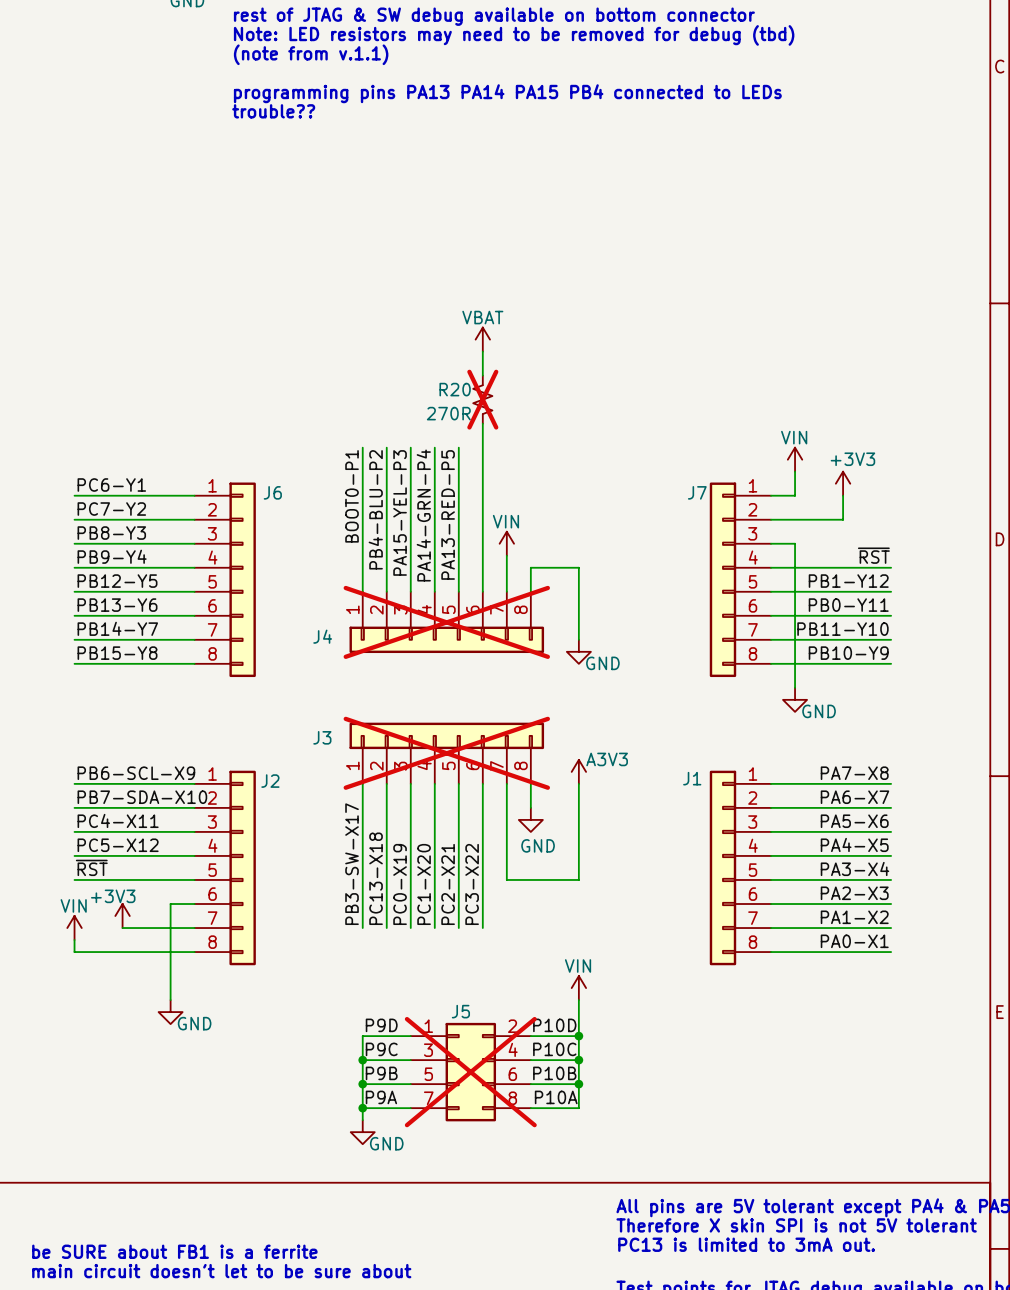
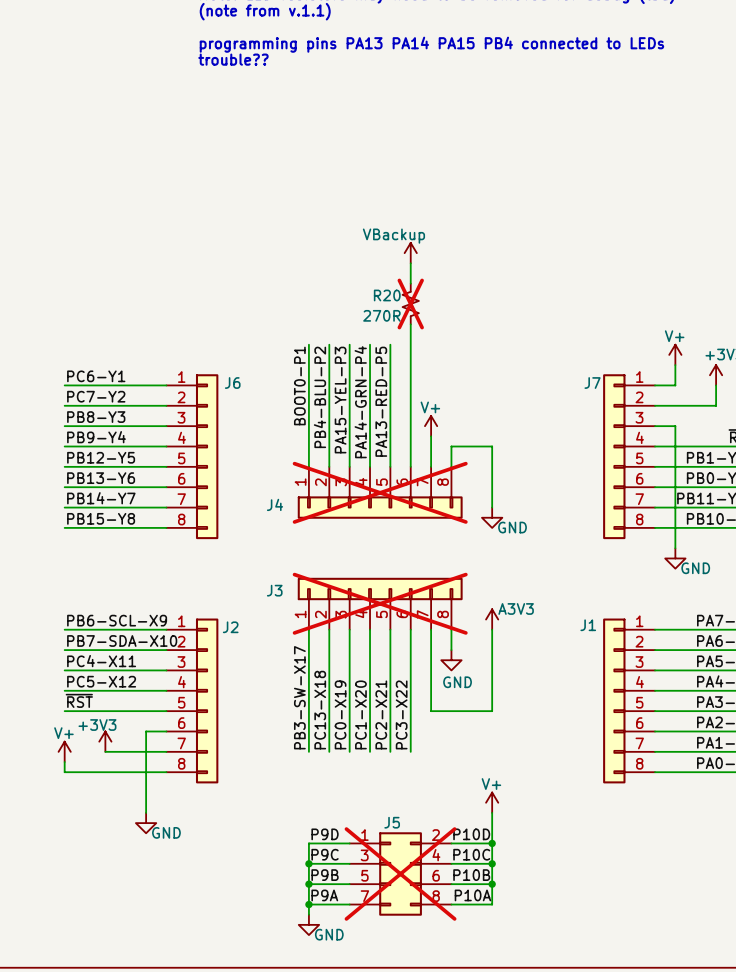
power symbol: VBAT (482, 339) -> VBackup (410, 253)
power symbol: VIN (795, 459) -> V+ (675, 354)
power symbol: VIN (506, 543) -> V+ (431, 426)
power symbol: VIN (74, 928) -> V+ (64, 751)
power symbol: VIN (578, 988) -> V+ (492, 802)

